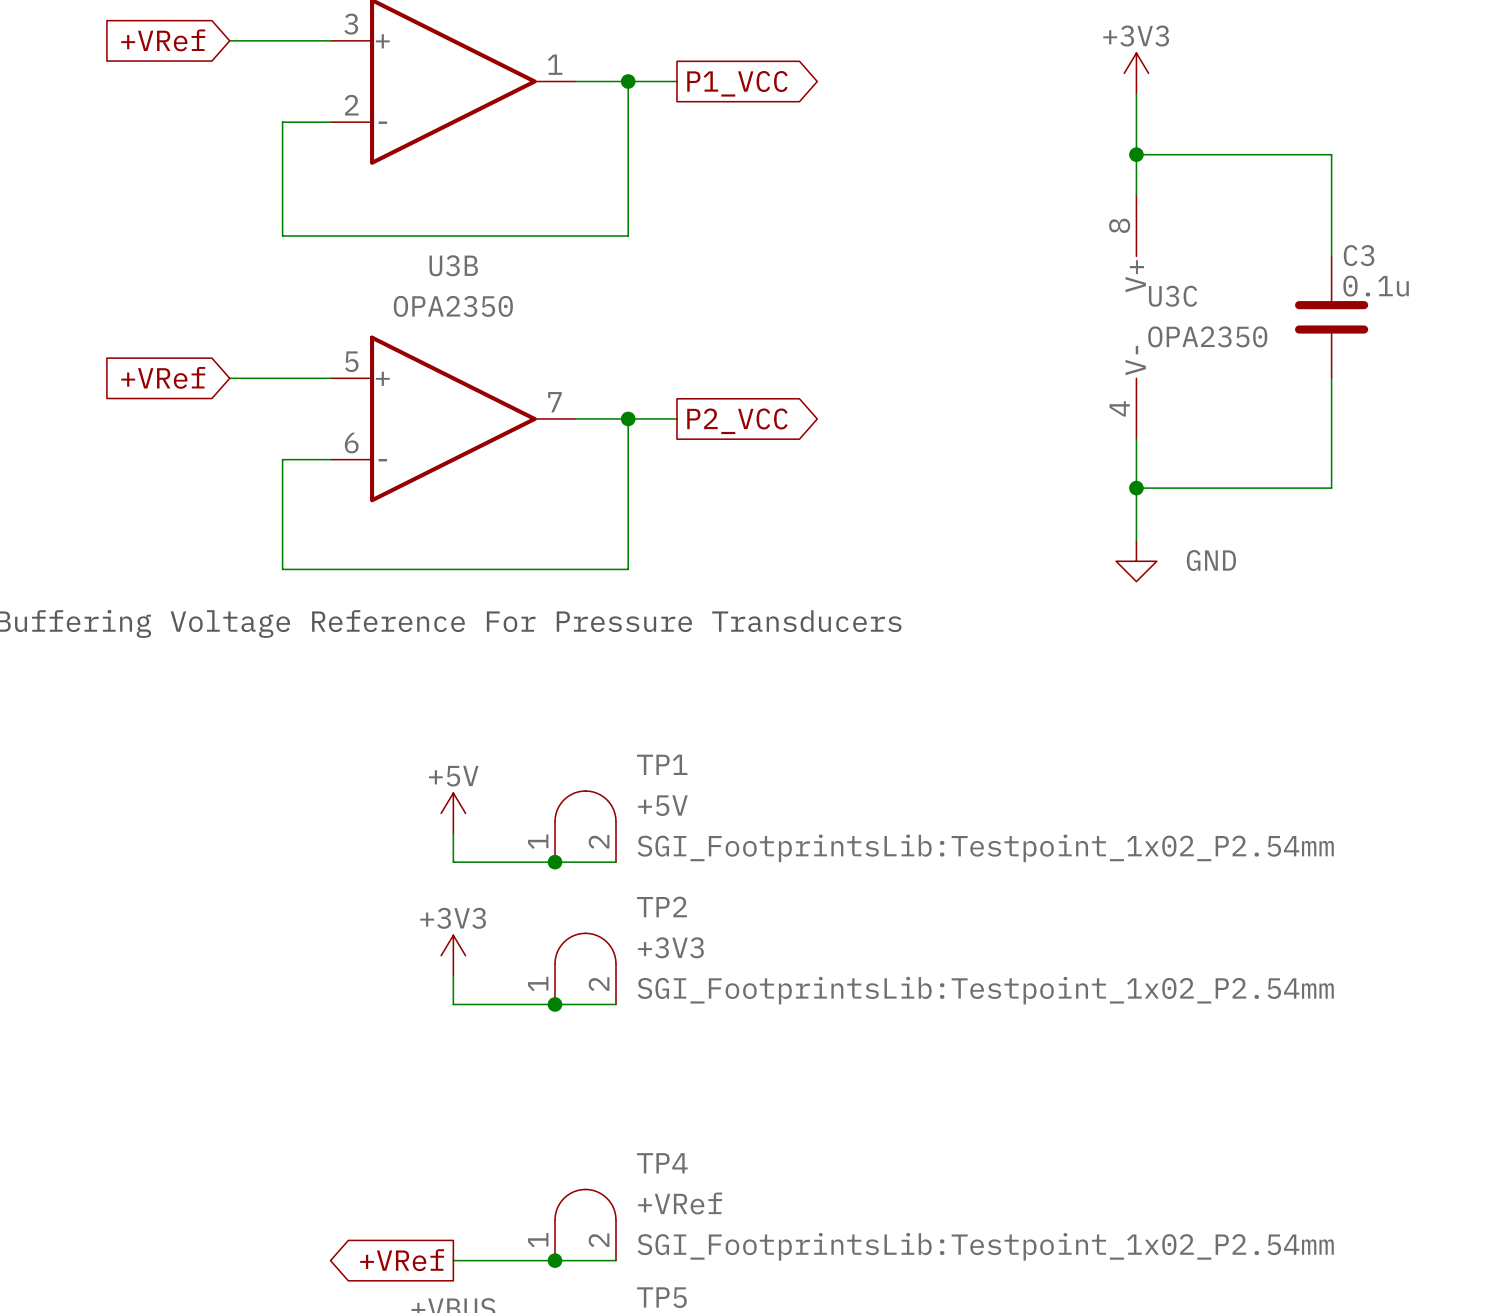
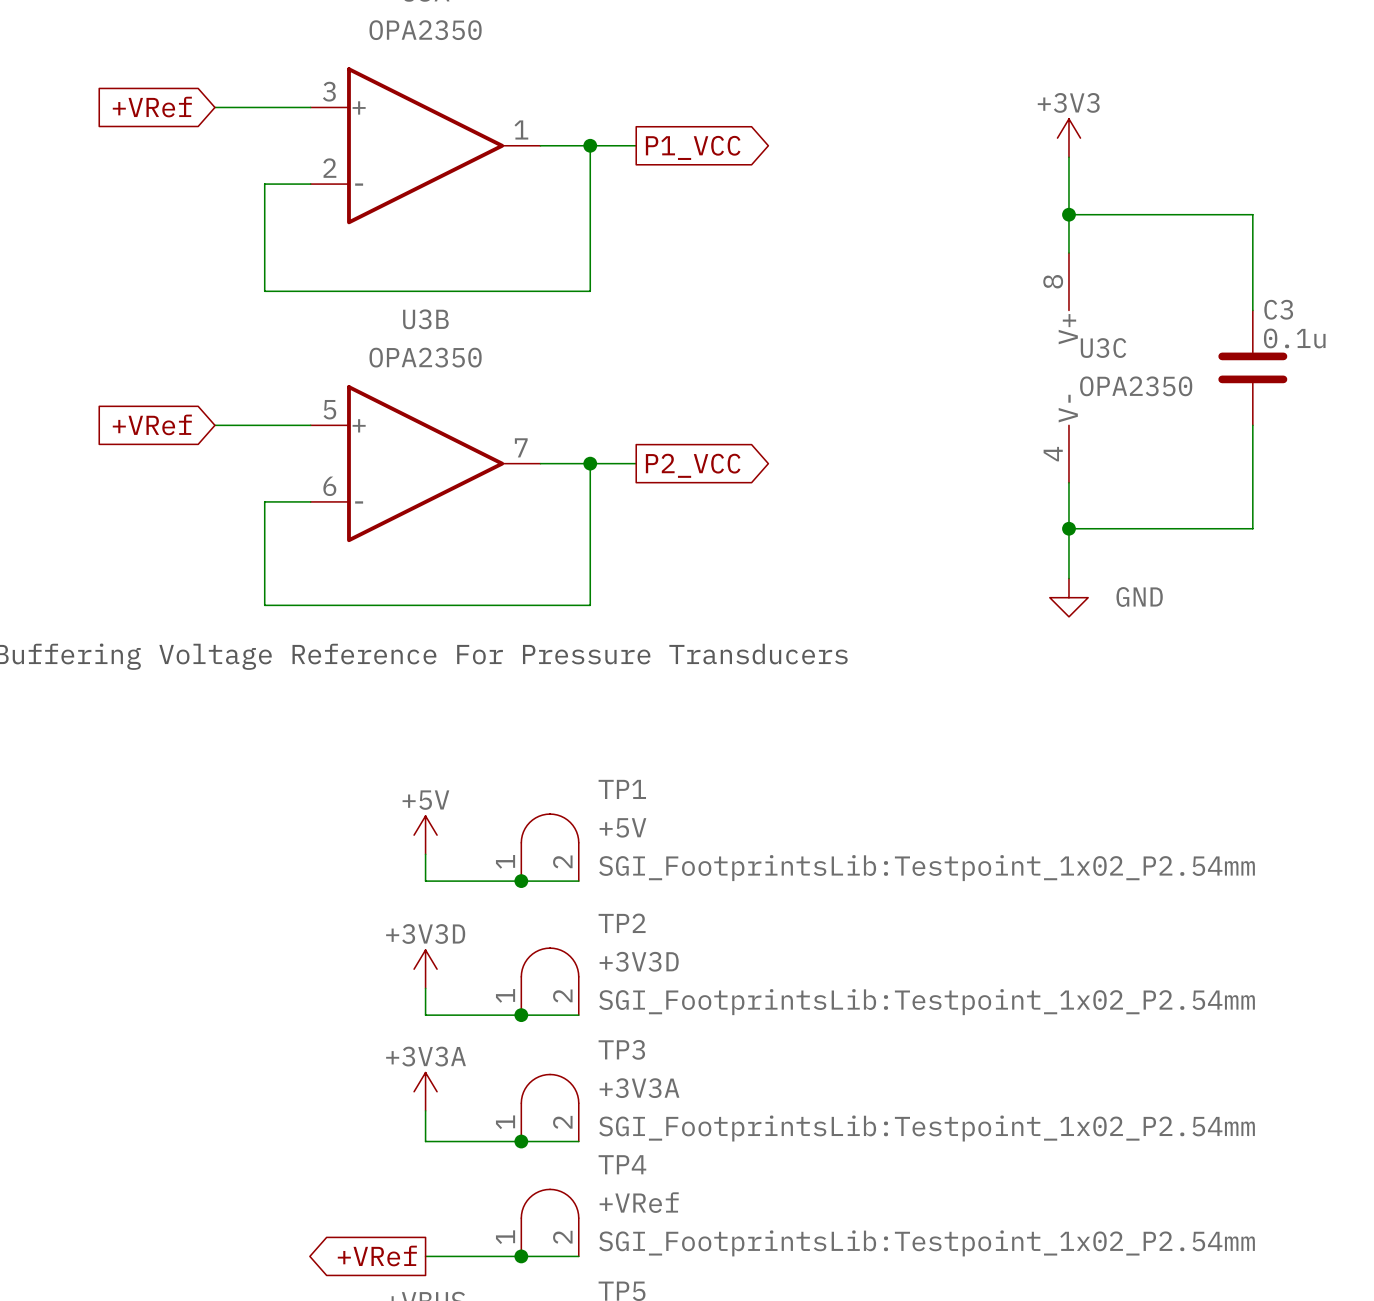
TP2 value: +3V3 (670, 947) -> +3V3D (639, 961)
power symbol: +3V3 (453, 955) -> +3V3D (425, 969)
power symbol: none -> +3V3A (425, 1091)
TP3: none -> +3V3A (550, 1108)
wire: none -> (425, 1110) (425, 1141) (578, 1141)
junction: none -> (521, 1141)

